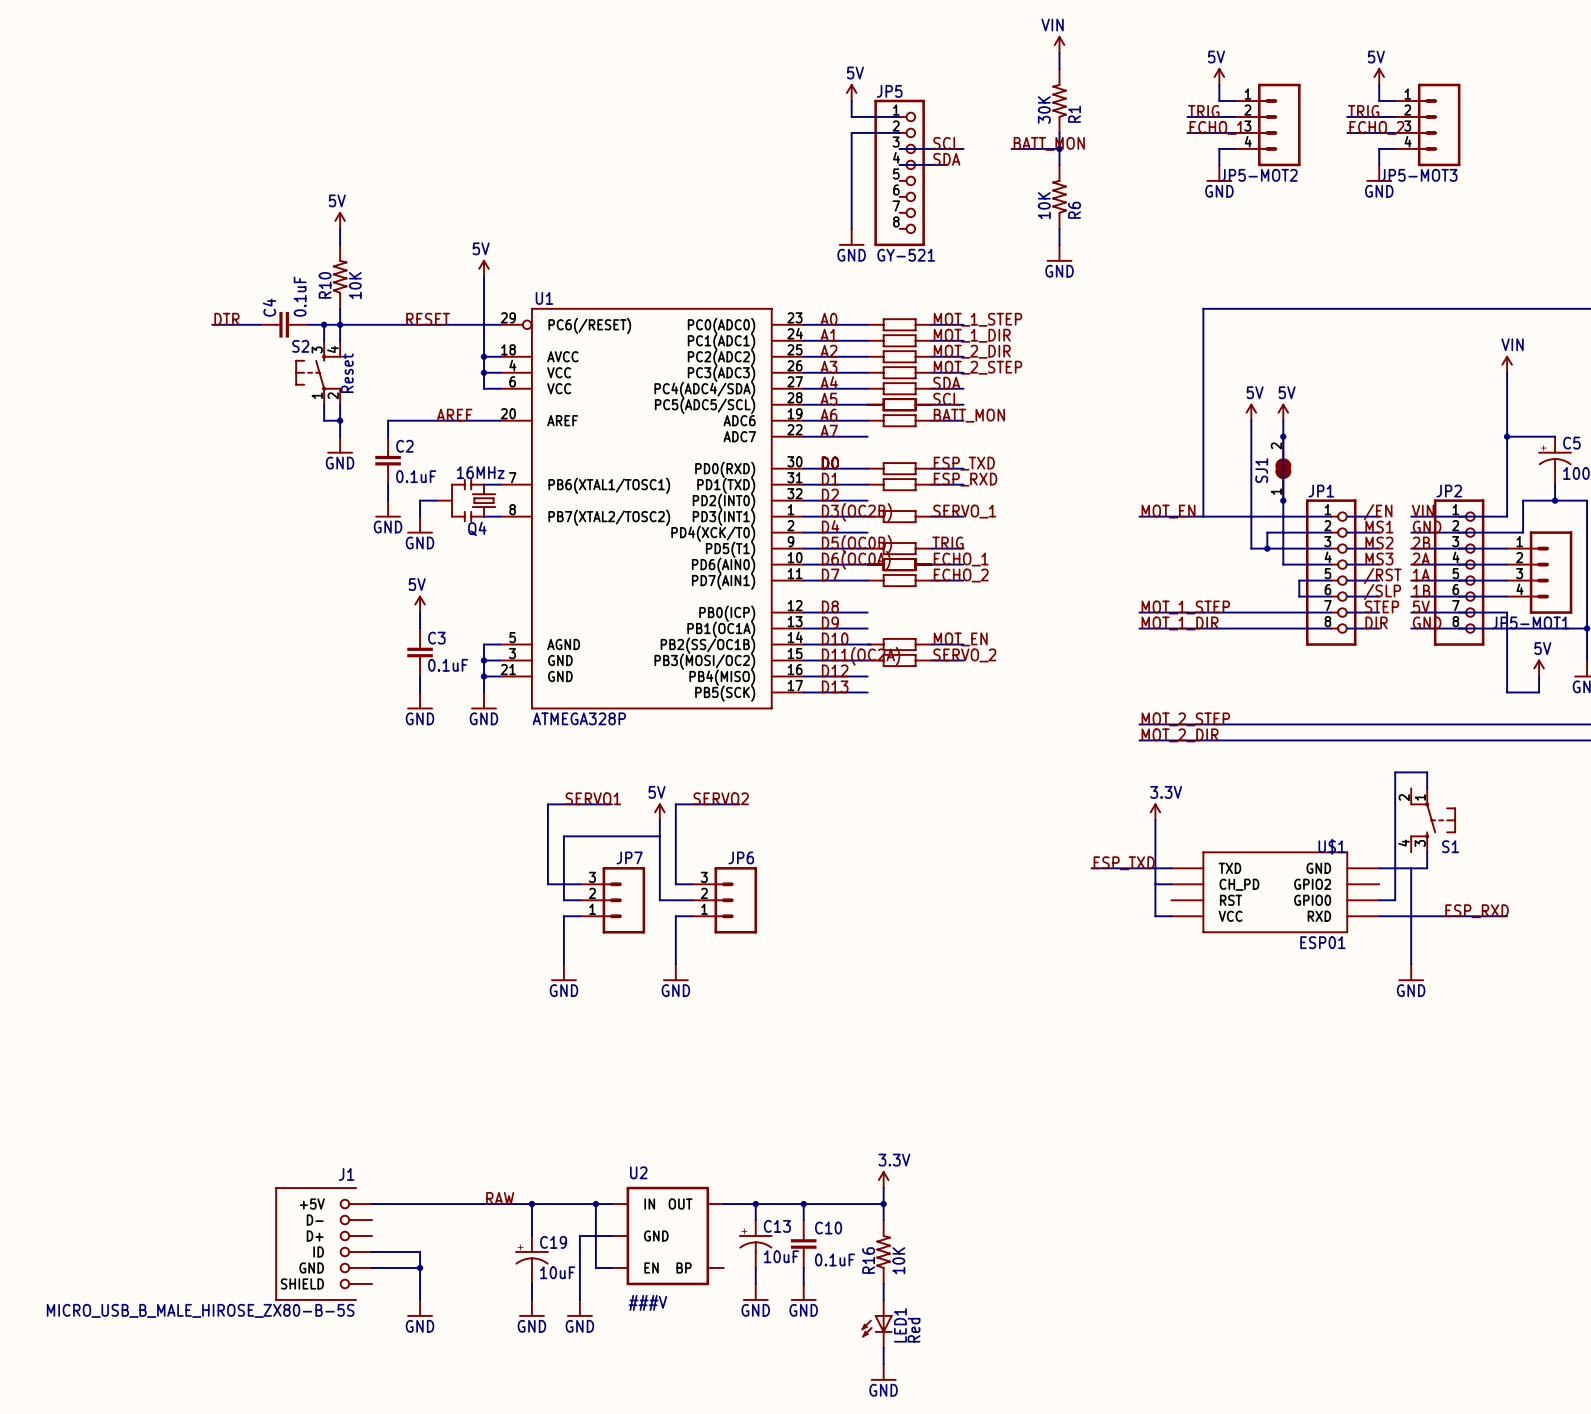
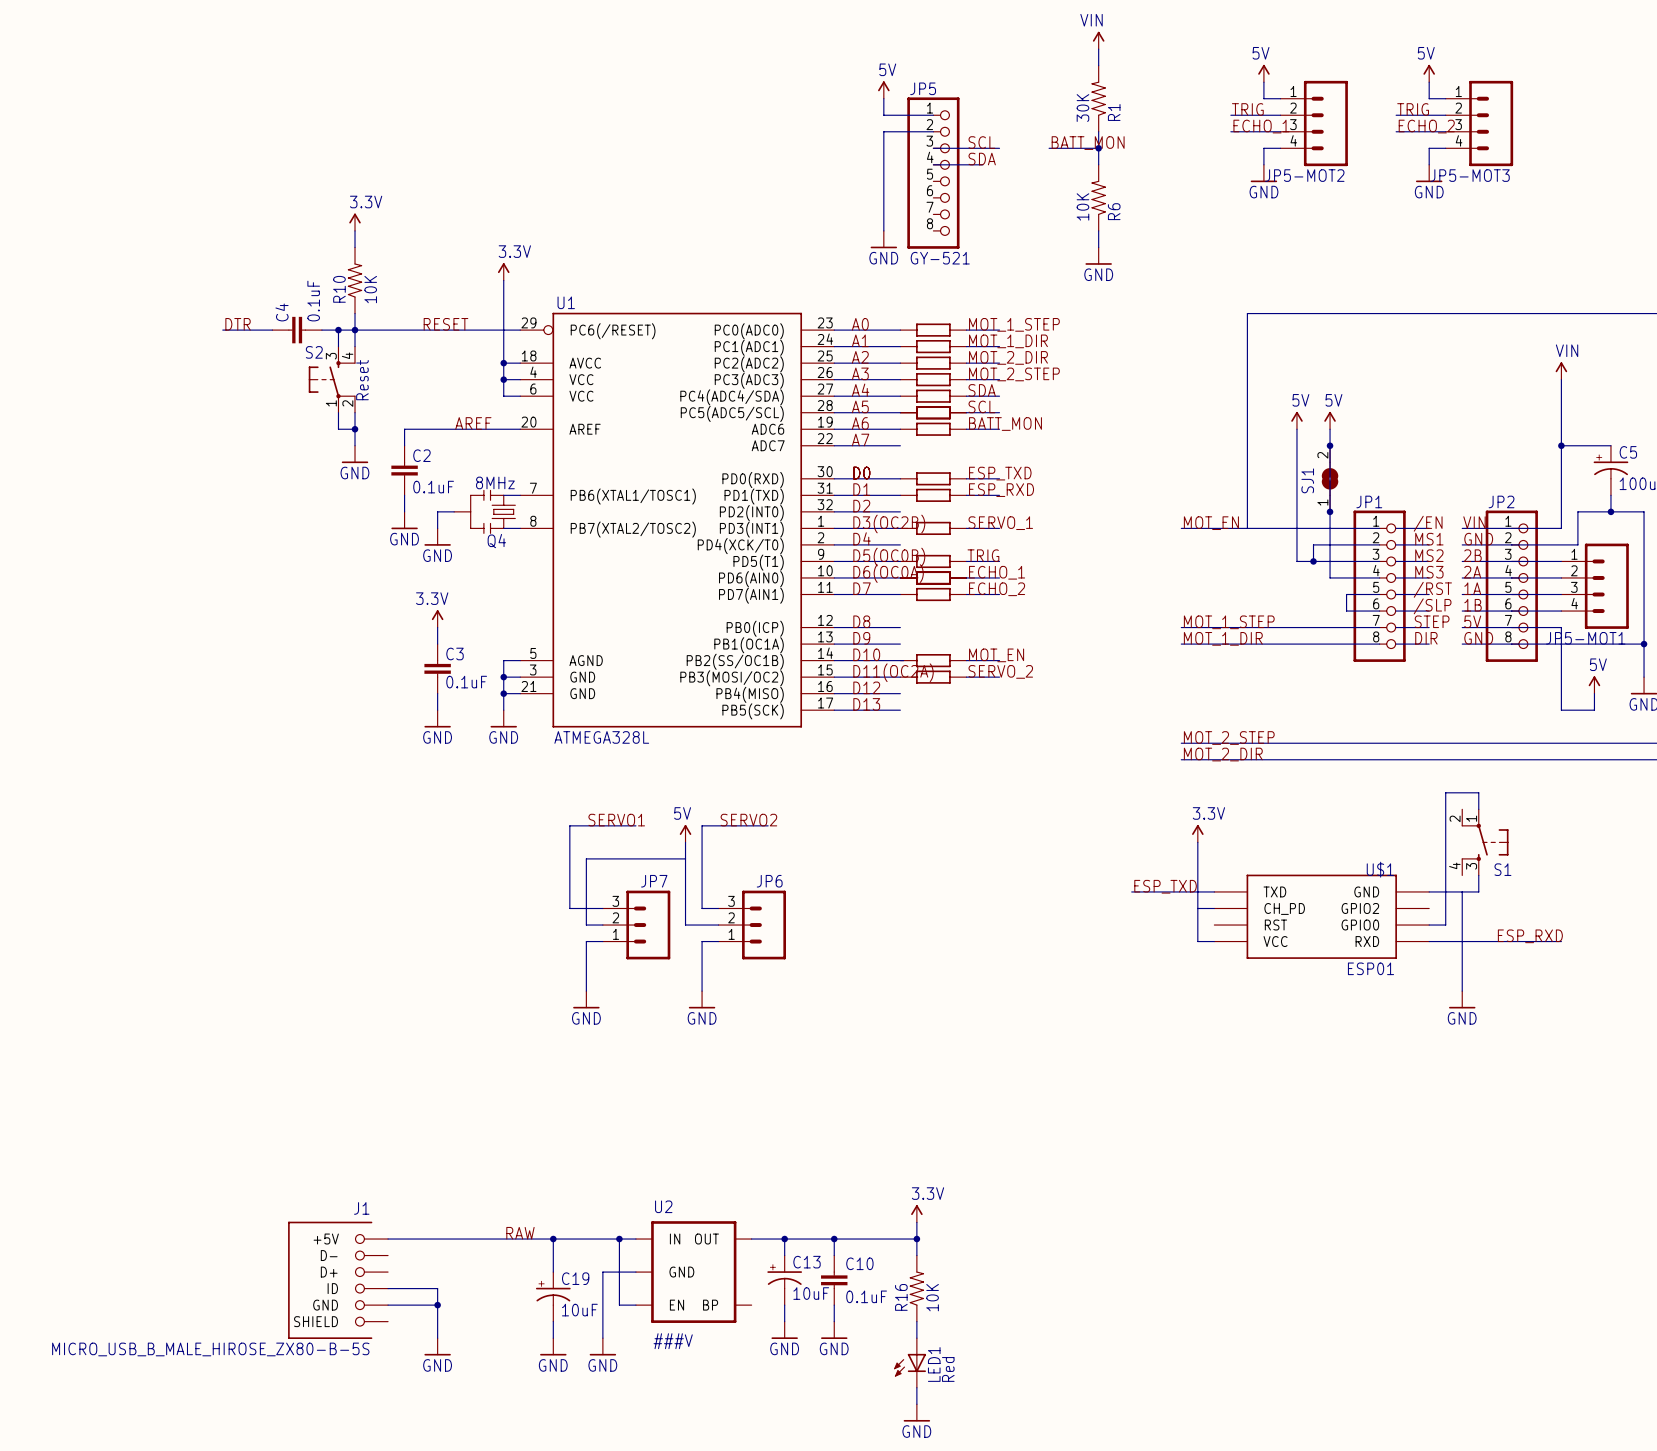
power symbol: 5V (340, 220) -> 3.3V (355, 222)
power symbol: 5V (483, 268) -> 3.3V (503, 271)
Q4 value: 16MHz (480, 472) -> 8MHz (495, 482)
power symbol: 5V (420, 604) -> 3.3V (437, 618)
U1 value: ATMEGA328P (579, 718) -> ATMEGA328L (601, 737)

